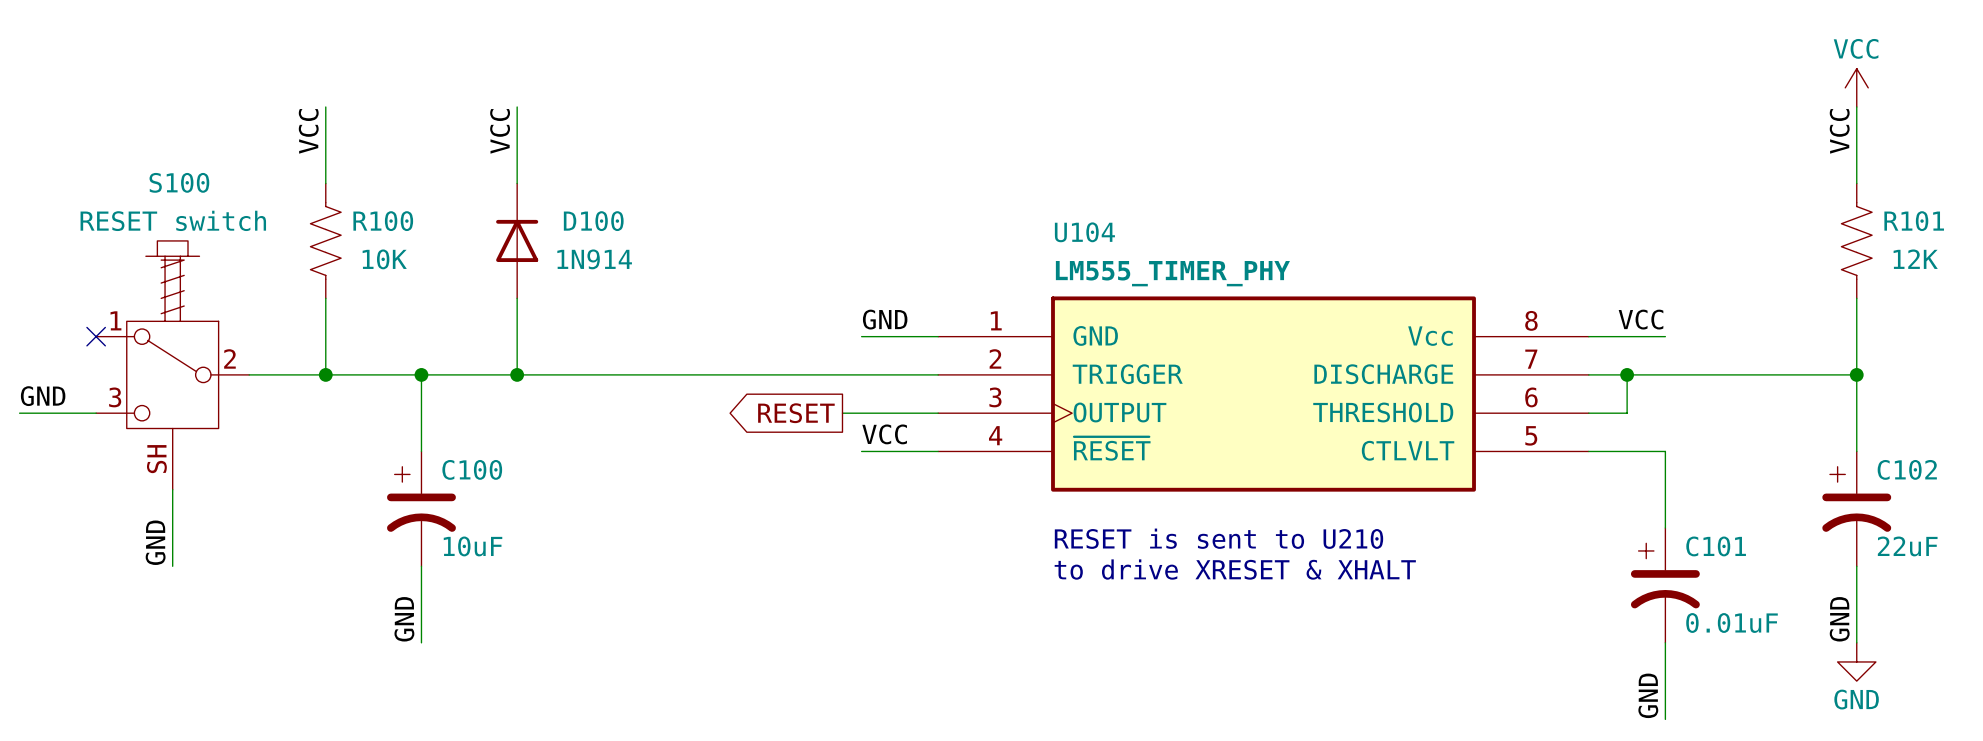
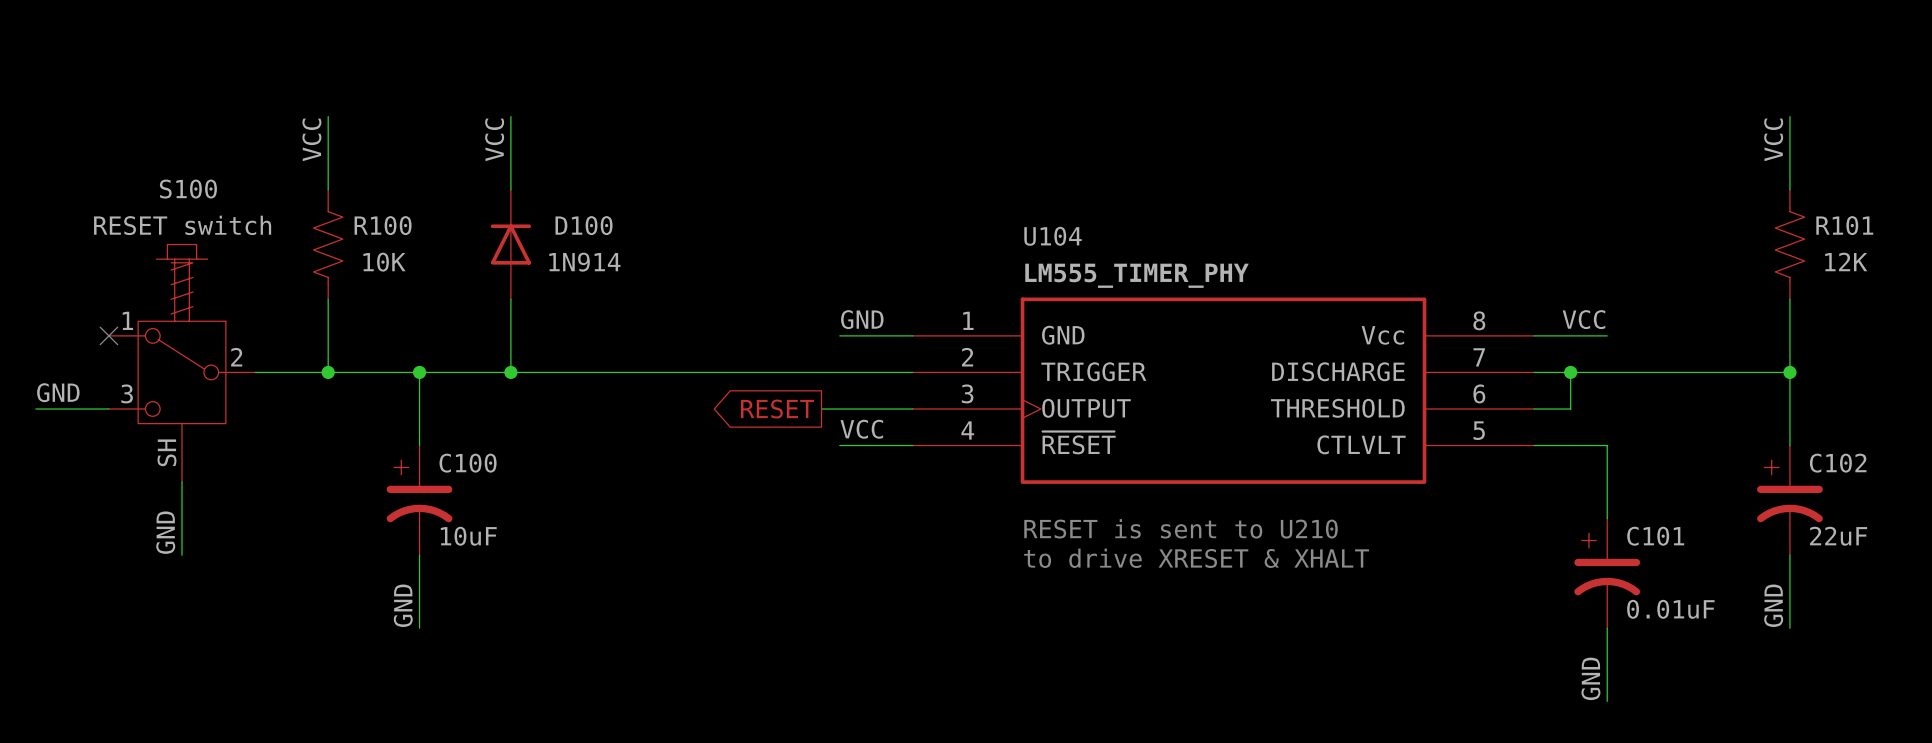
power symbol: VCC (1856, 87) -> none
power symbol: GND (1856, 661) -> none

